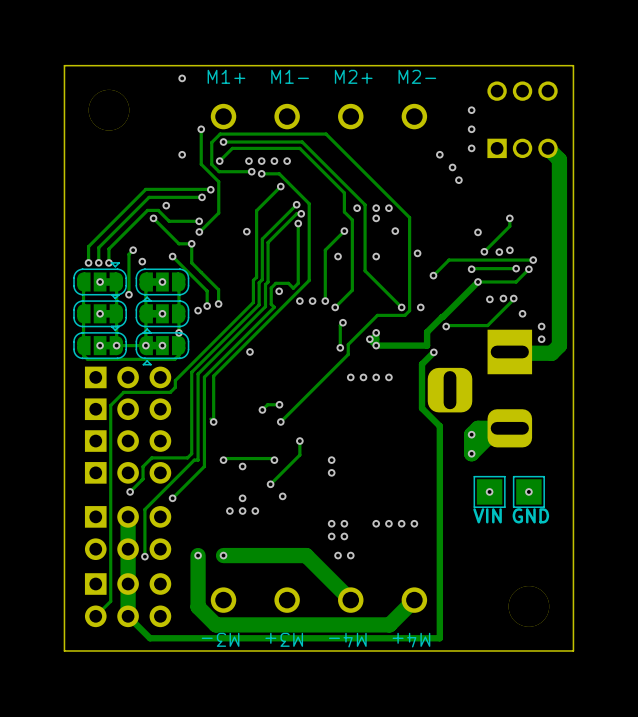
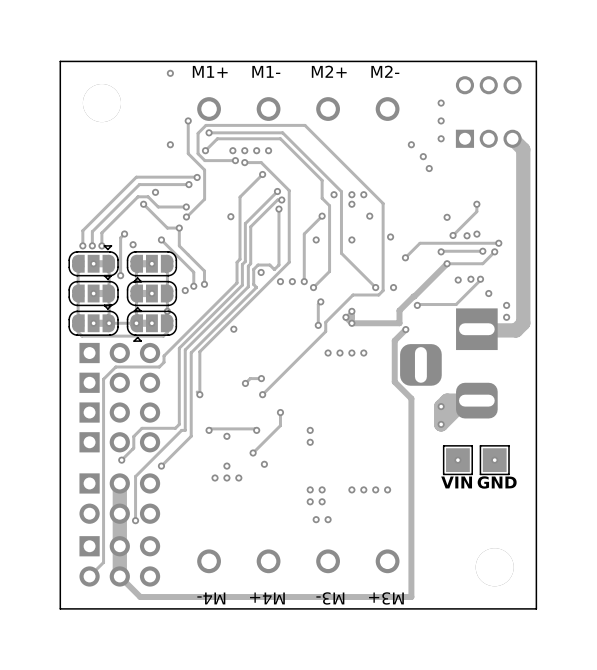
track: (198, 555) (198, 607) (215, 624) (389, 624) (414, 600) -> none
via: (198, 555) -> none
track: (223, 555) (306, 555) (350, 600) -> none
via: (223, 555) -> none
text: M3- (220, 639) -> M4- (211, 598)
text: M3+ (284, 639) -> M4+ (267, 598)
text: M4- (347, 640) -> M3- (330, 598)
text: M4+ (411, 640) -> M3+ (386, 598)

